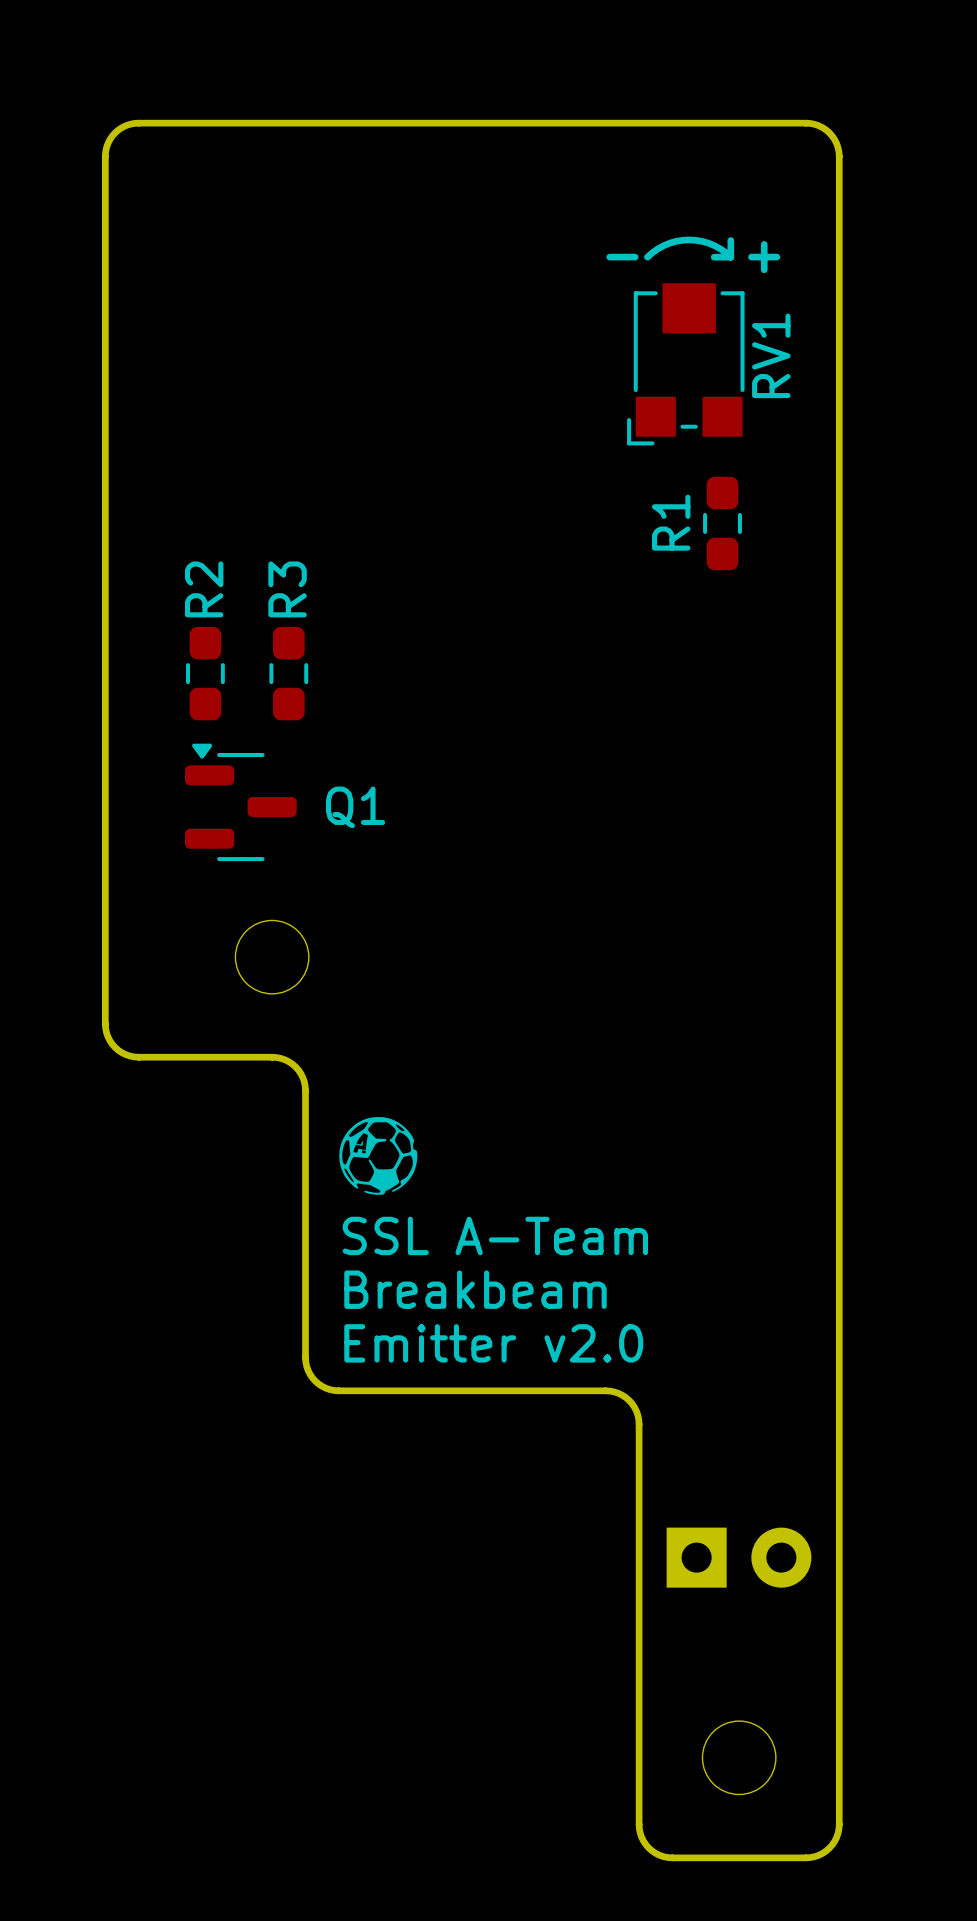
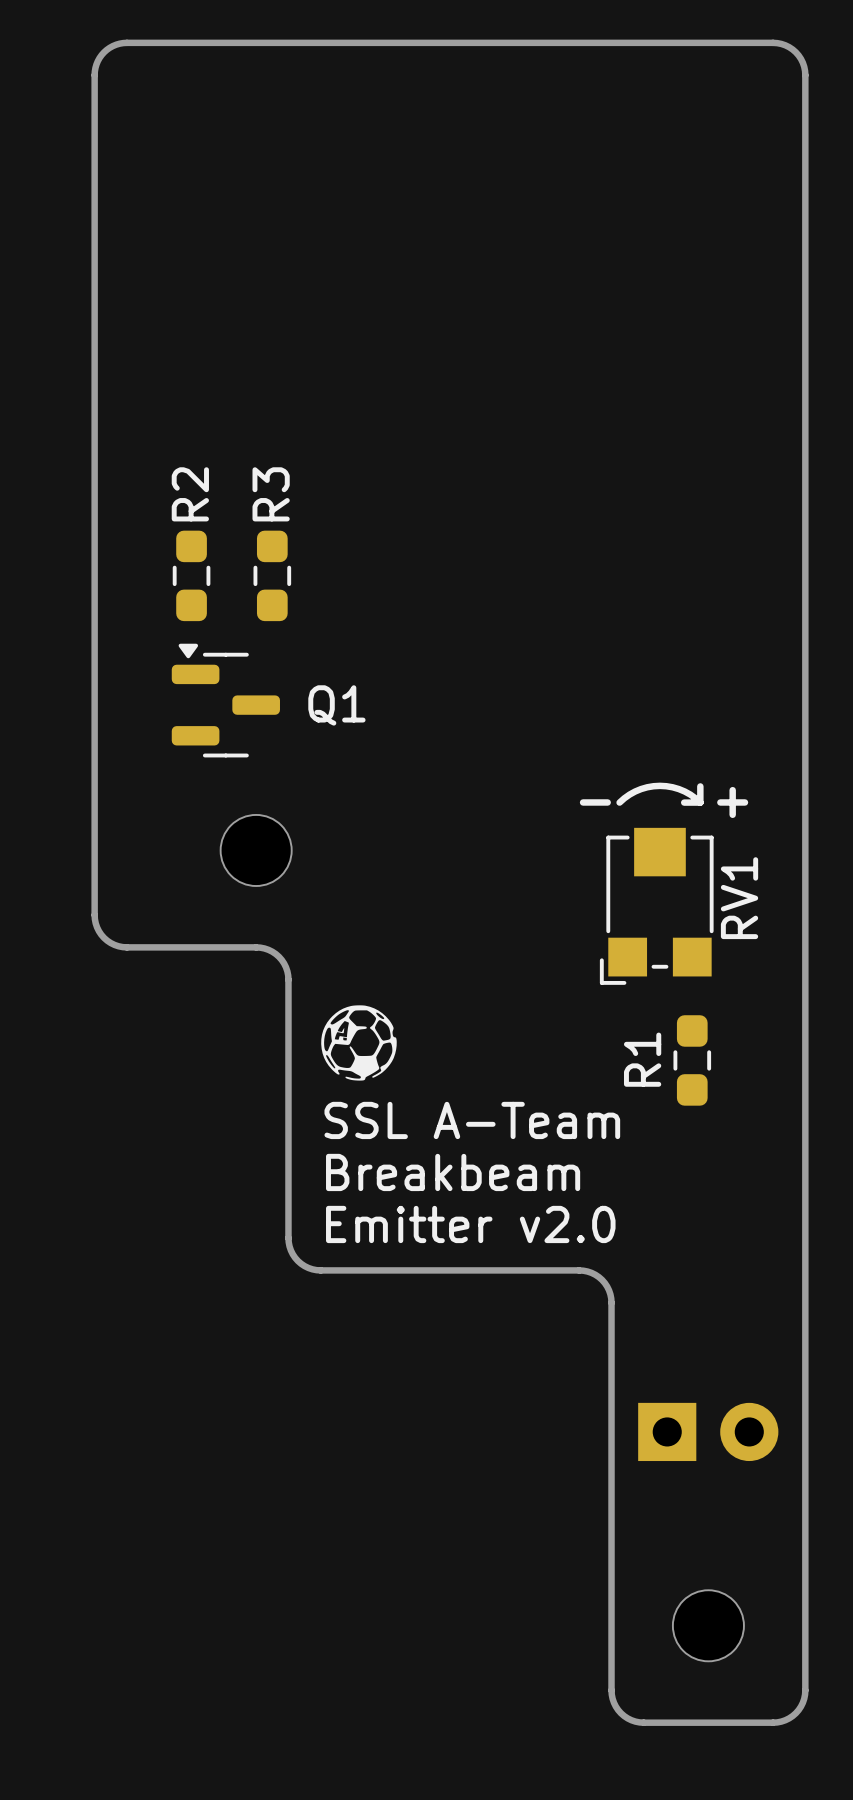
line: (730, 240) (730, 257) -> (700, 786) (700, 802)
text position: - (622, 257) -> - (595, 802)
line: (647, 257) (663, 245) (689, 239) (714, 245) (730, 257) -> (619, 802) (641, 789) (659, 785) (678, 789) (700, 802)
line: (714, 257) (730, 257) -> (684, 802) (700, 802)
text position: + (764, 257) -> + (732, 802)
RV1 position: (685, 364) -> (656, 906)
R1 position: (722, 523) -> (692, 1060)

